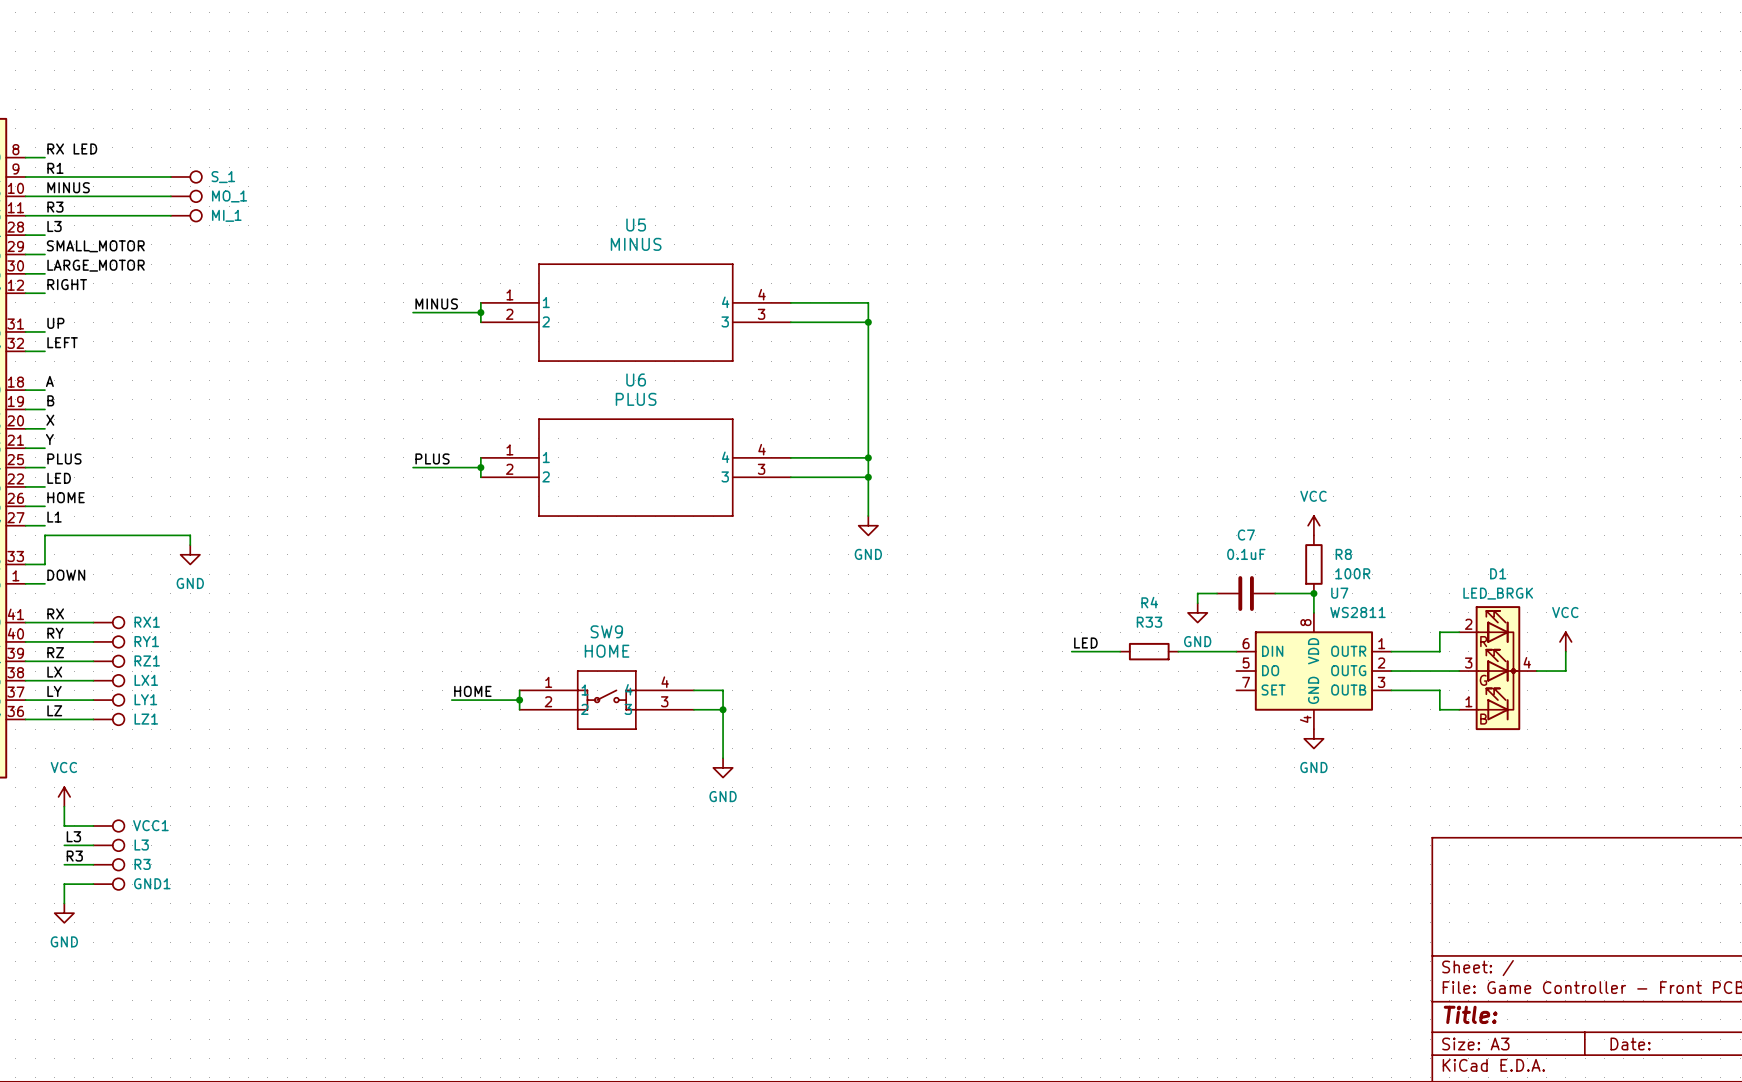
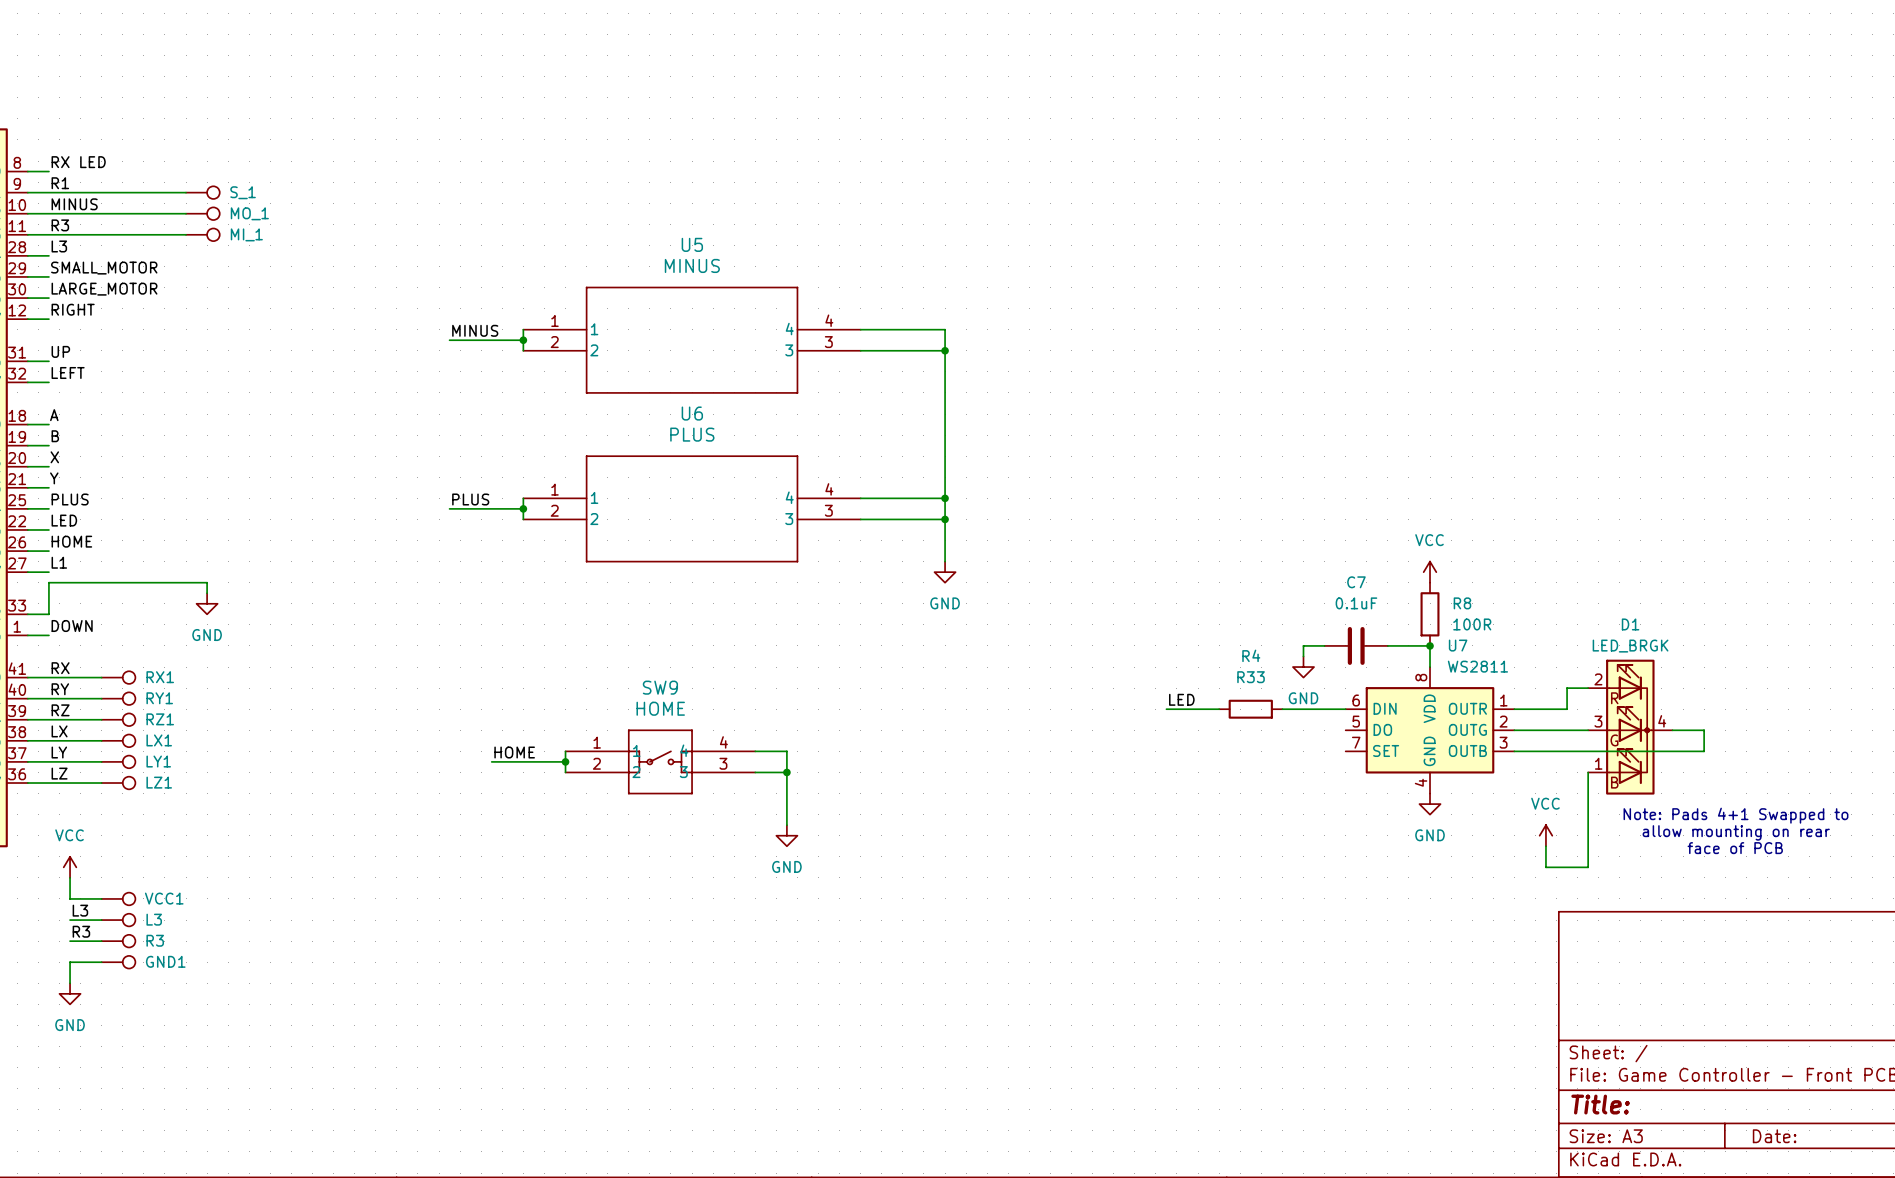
power symbol: VCC (1565, 641) -> none
wire: (1565, 651) (1565, 671) -> (1567, 751) (1704, 751) (1704, 730)
wire: (1439, 690) (1439, 709) (1459, 709) -> (1545, 846) (1545, 867) (1588, 867) (1588, 772)
text: none -> Note: Pads 4+1 Swapped to (1735, 815)
text: none -> allow mounting on rear (1736, 832)
power symbol: none -> VCC (1545, 835)
text: none -> face of PCB (1735, 848)

